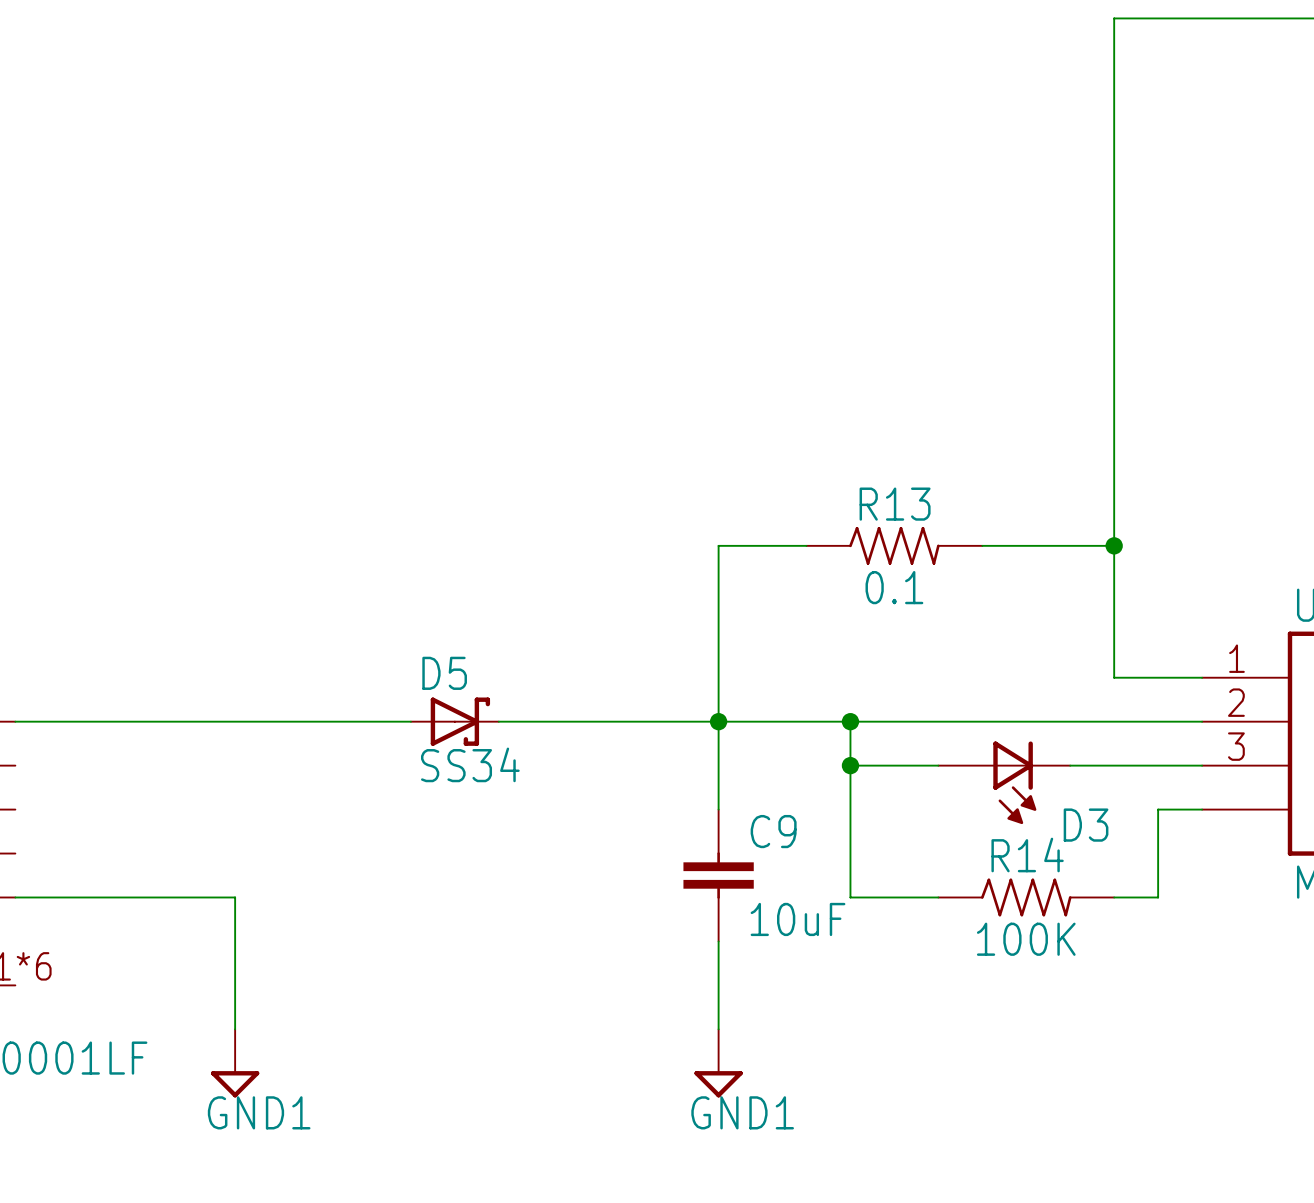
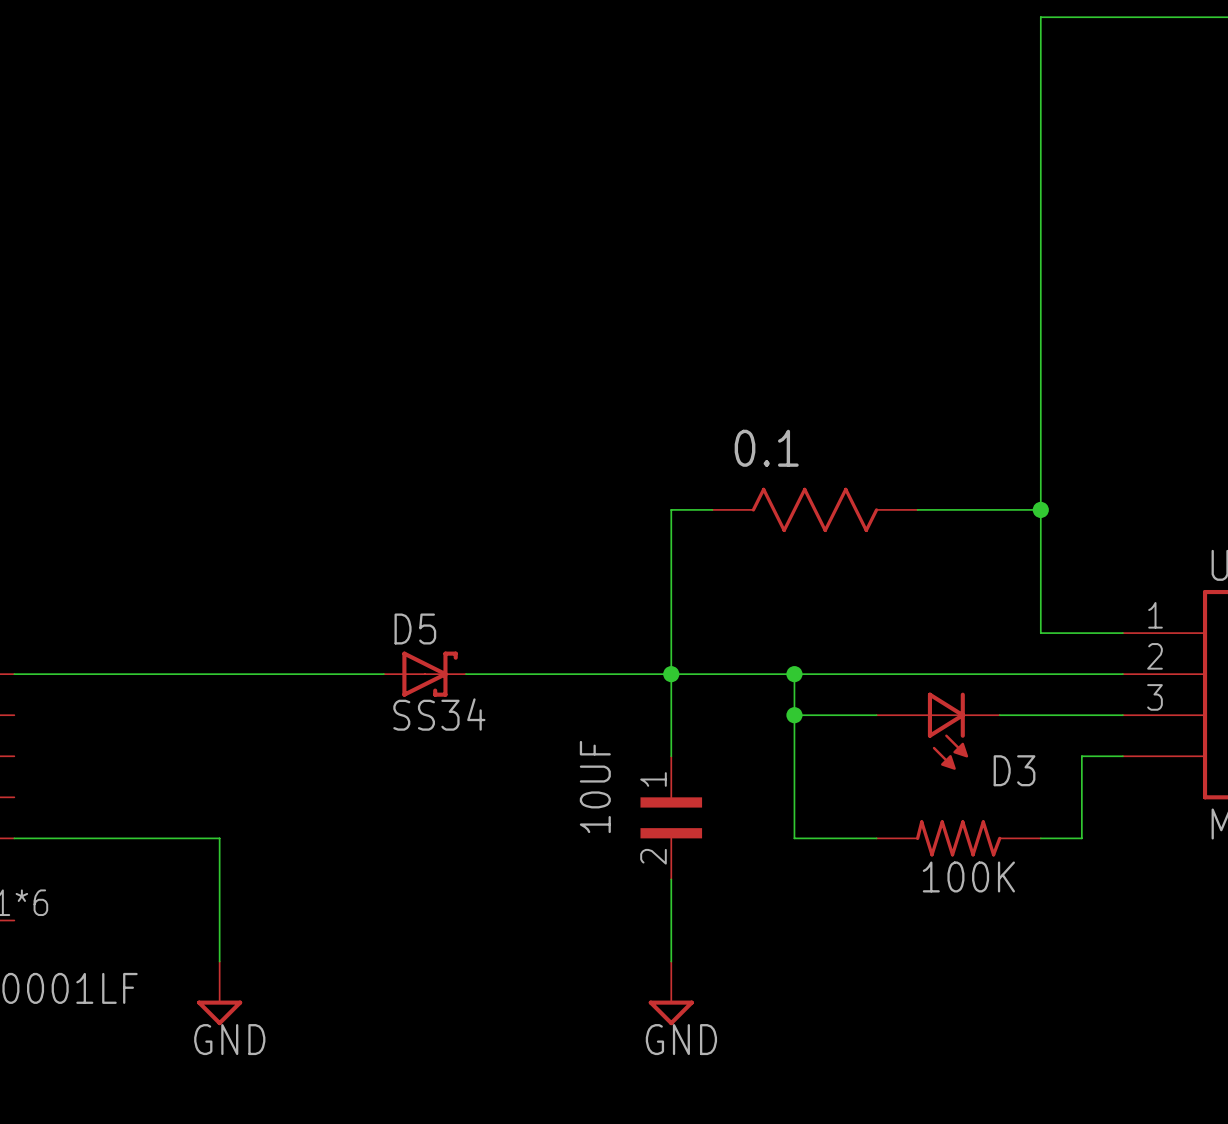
0.1: none -> (814, 509)
R13: 0.1 (894, 545) -> none
C9: 10uF (718, 875) -> none
10UF: none -> (671, 817)
R14: 100K (1026, 897) -> none
100K: none -> (958, 838)
power symbol: GND1 (235, 1063) -> GND (219, 993)
power symbol: GND1 (718, 1063) -> GND (671, 993)

